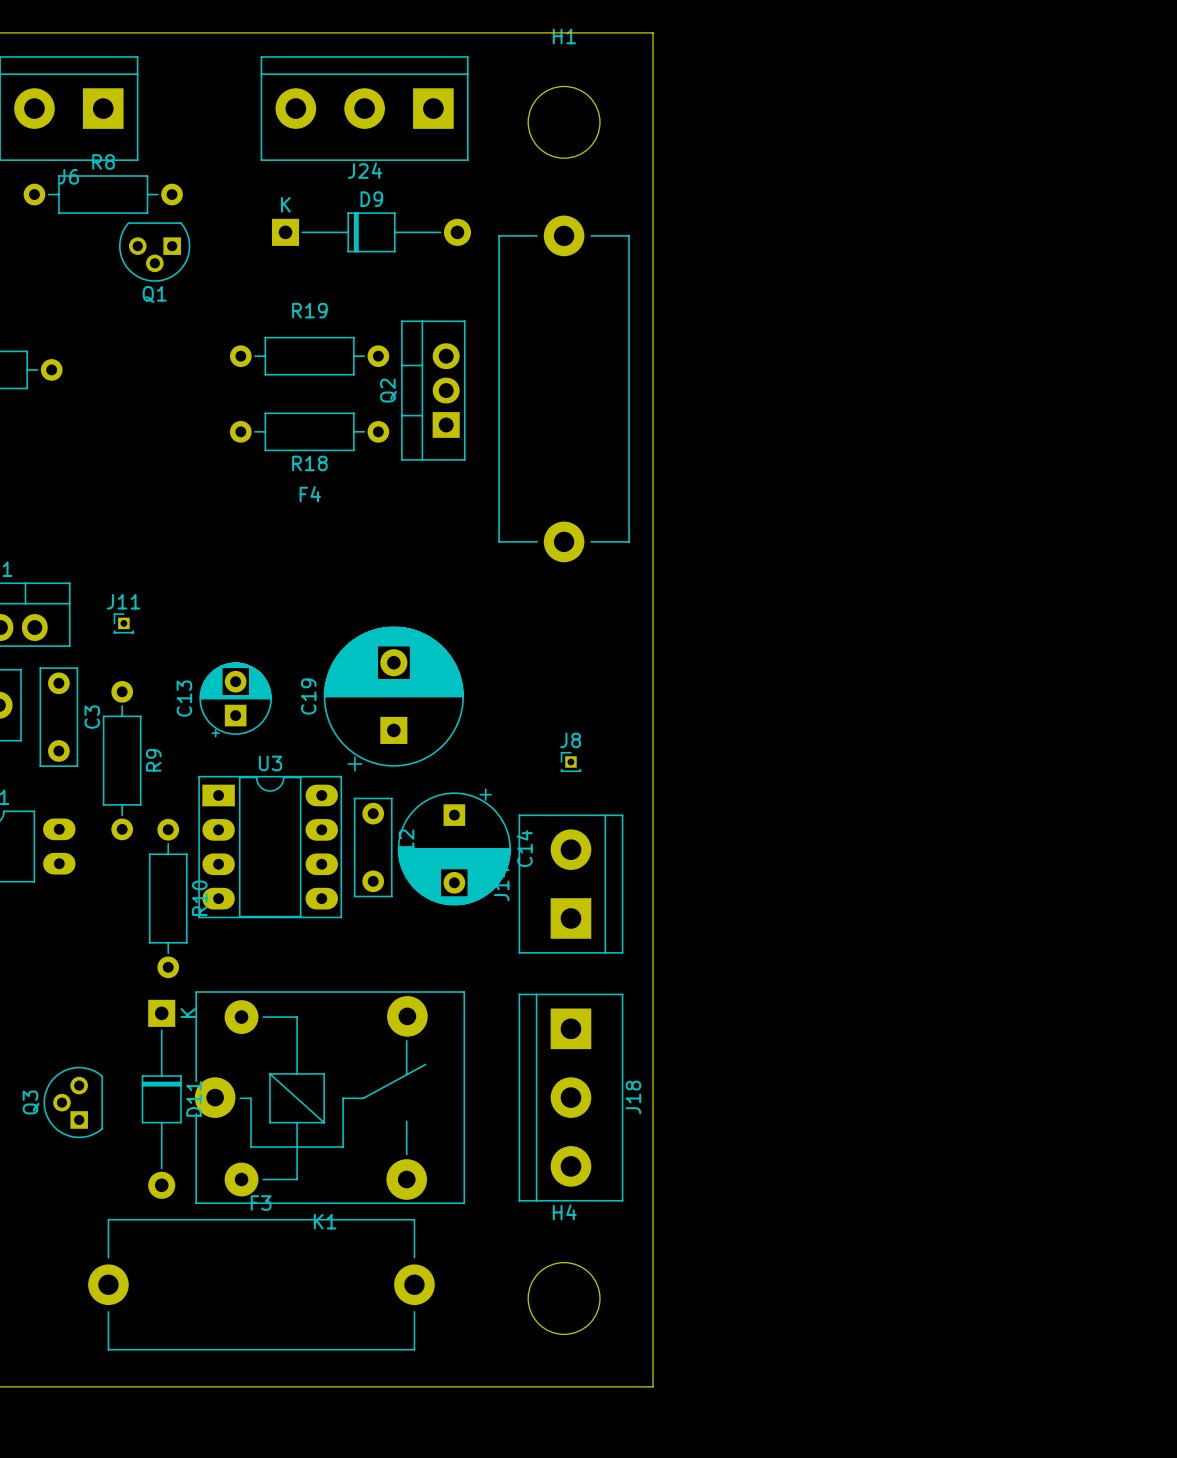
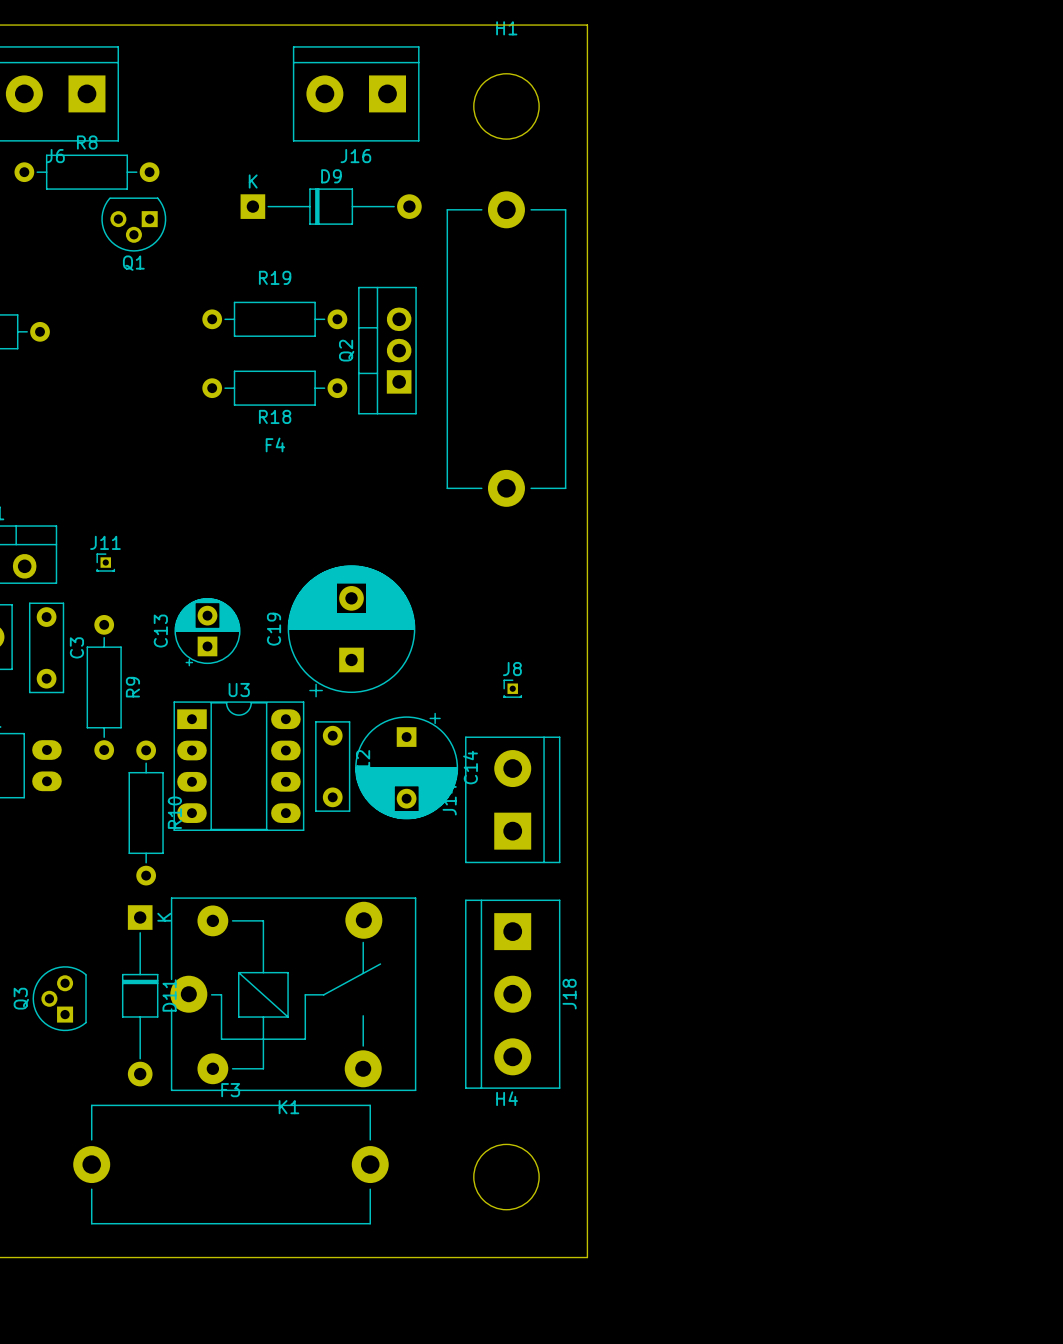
J24: (364, 108) -> none
J16: none -> (356, 93)

